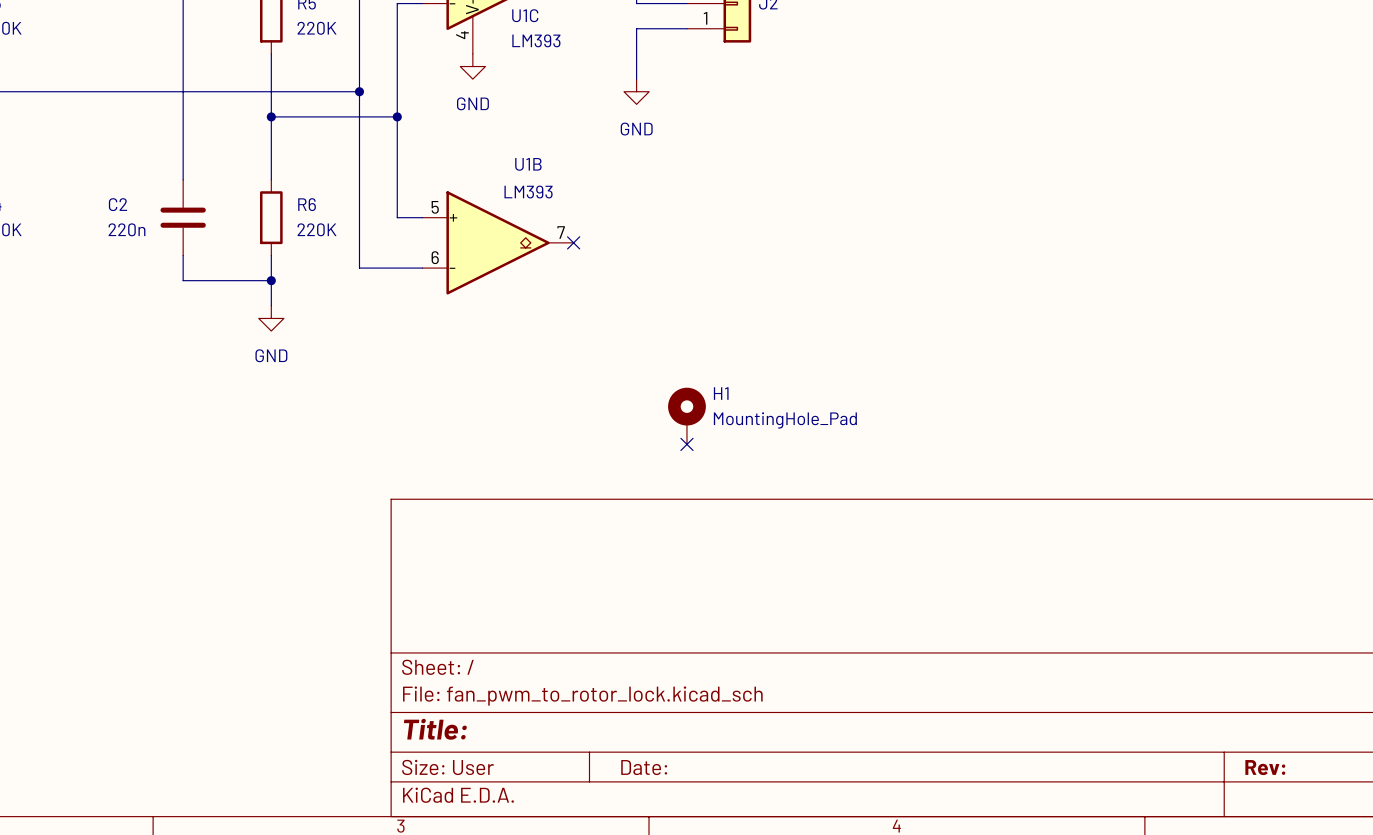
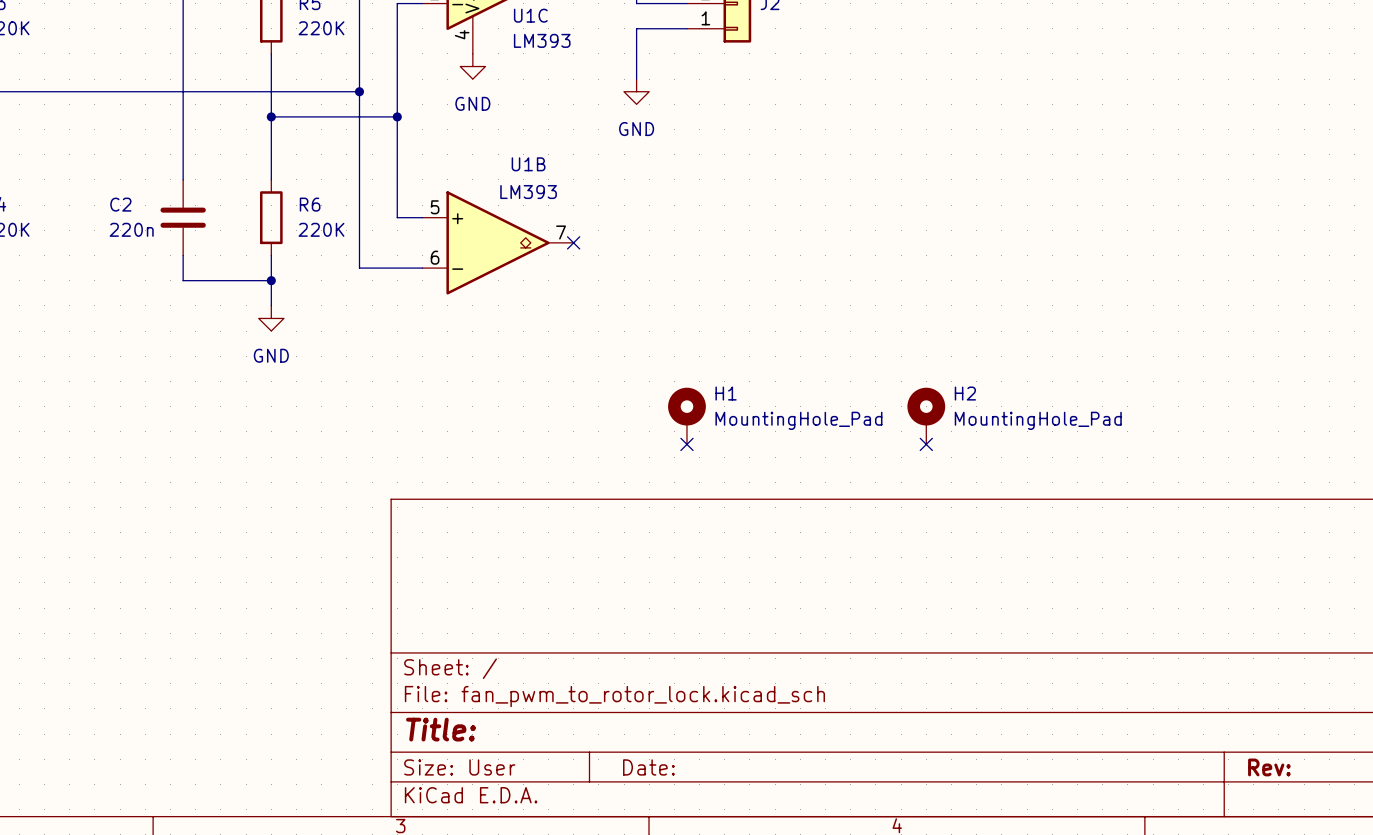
H2: none -> MountingHole_Pad (926, 416)
no-connect mark: none -> (926, 444)

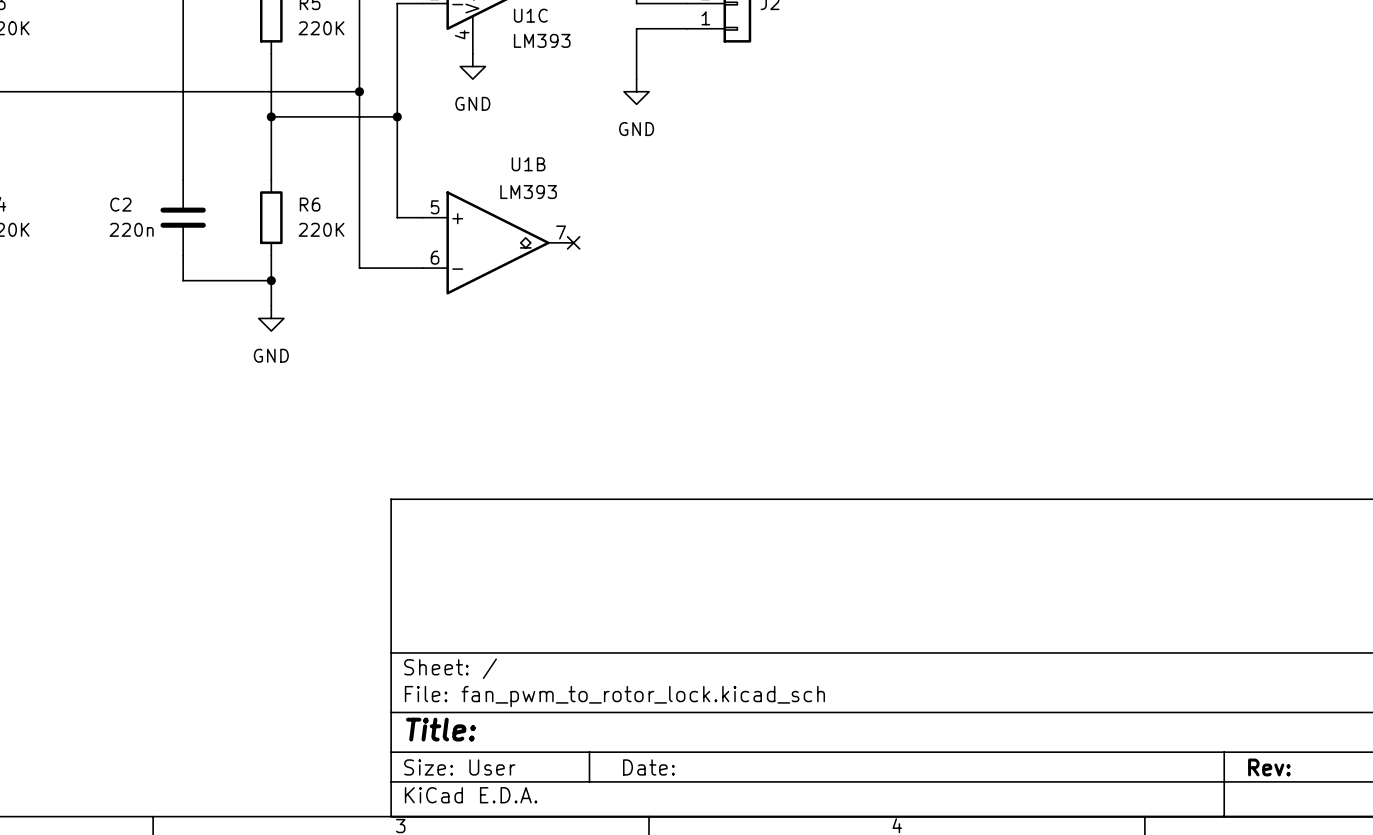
H1: MountingHole_Pad (686, 416) -> none
H2: MountingHole_Pad (926, 416) -> none
no-connect mark: (686, 444) -> none
no-connect mark: (926, 444) -> none

